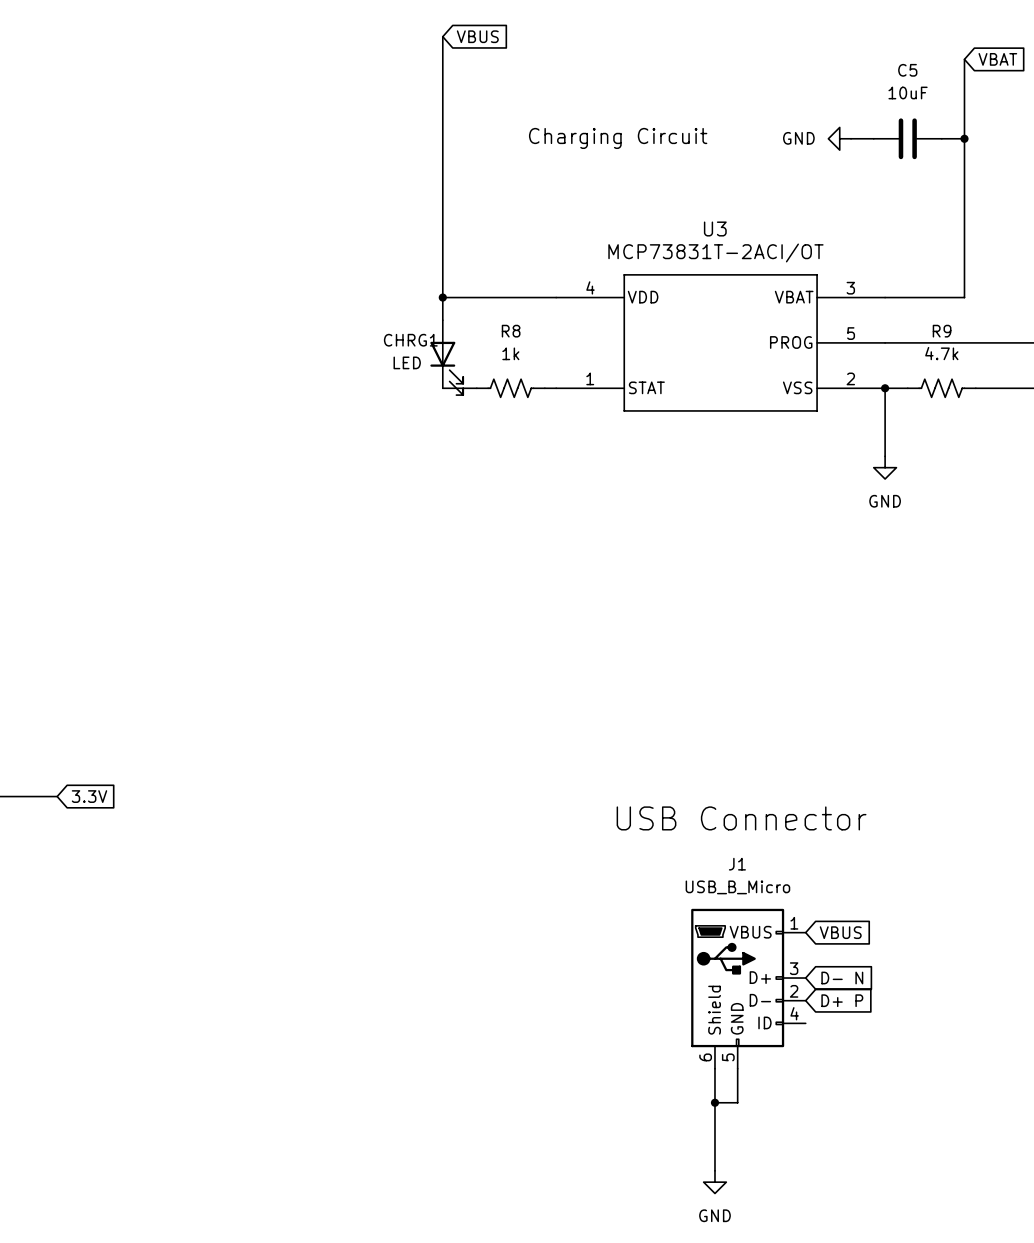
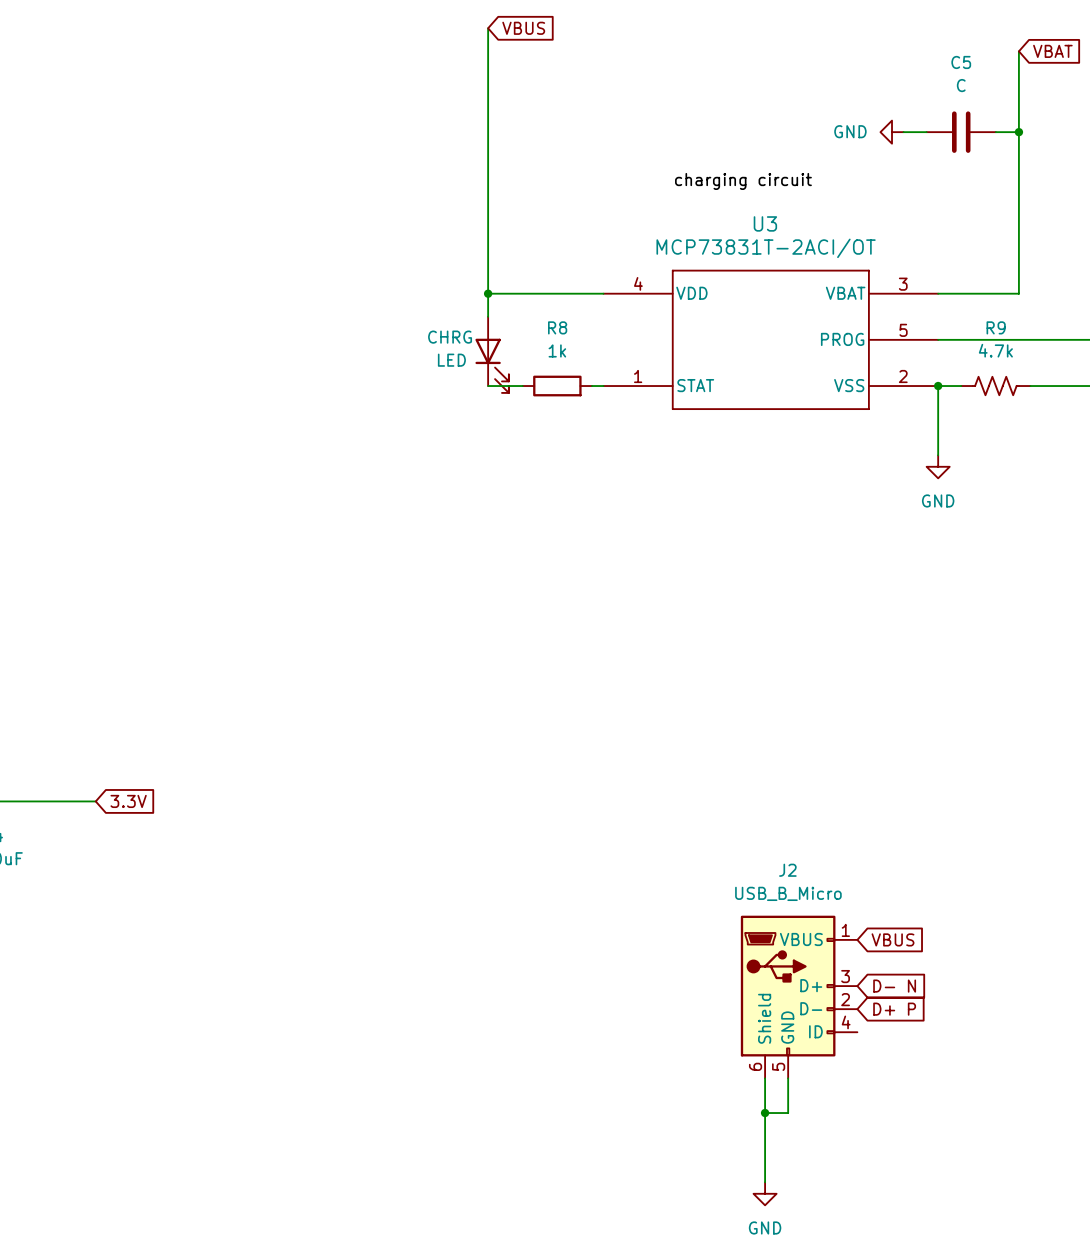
C5 value: 10uF (908, 92) -> C (961, 85)
text: Charging Circuit (618, 138) -> none
label: none -> charging circuit (743, 181)
CHRG1 name: CHRG1 (410, 340) -> CHRG (450, 337)
R8 symbol: [476, 379, 545, 398] -> [522, 375, 592, 397]
text: USB Connector (741, 818) -> none
J1 name: J1 (737, 864) -> J2 (787, 870)

